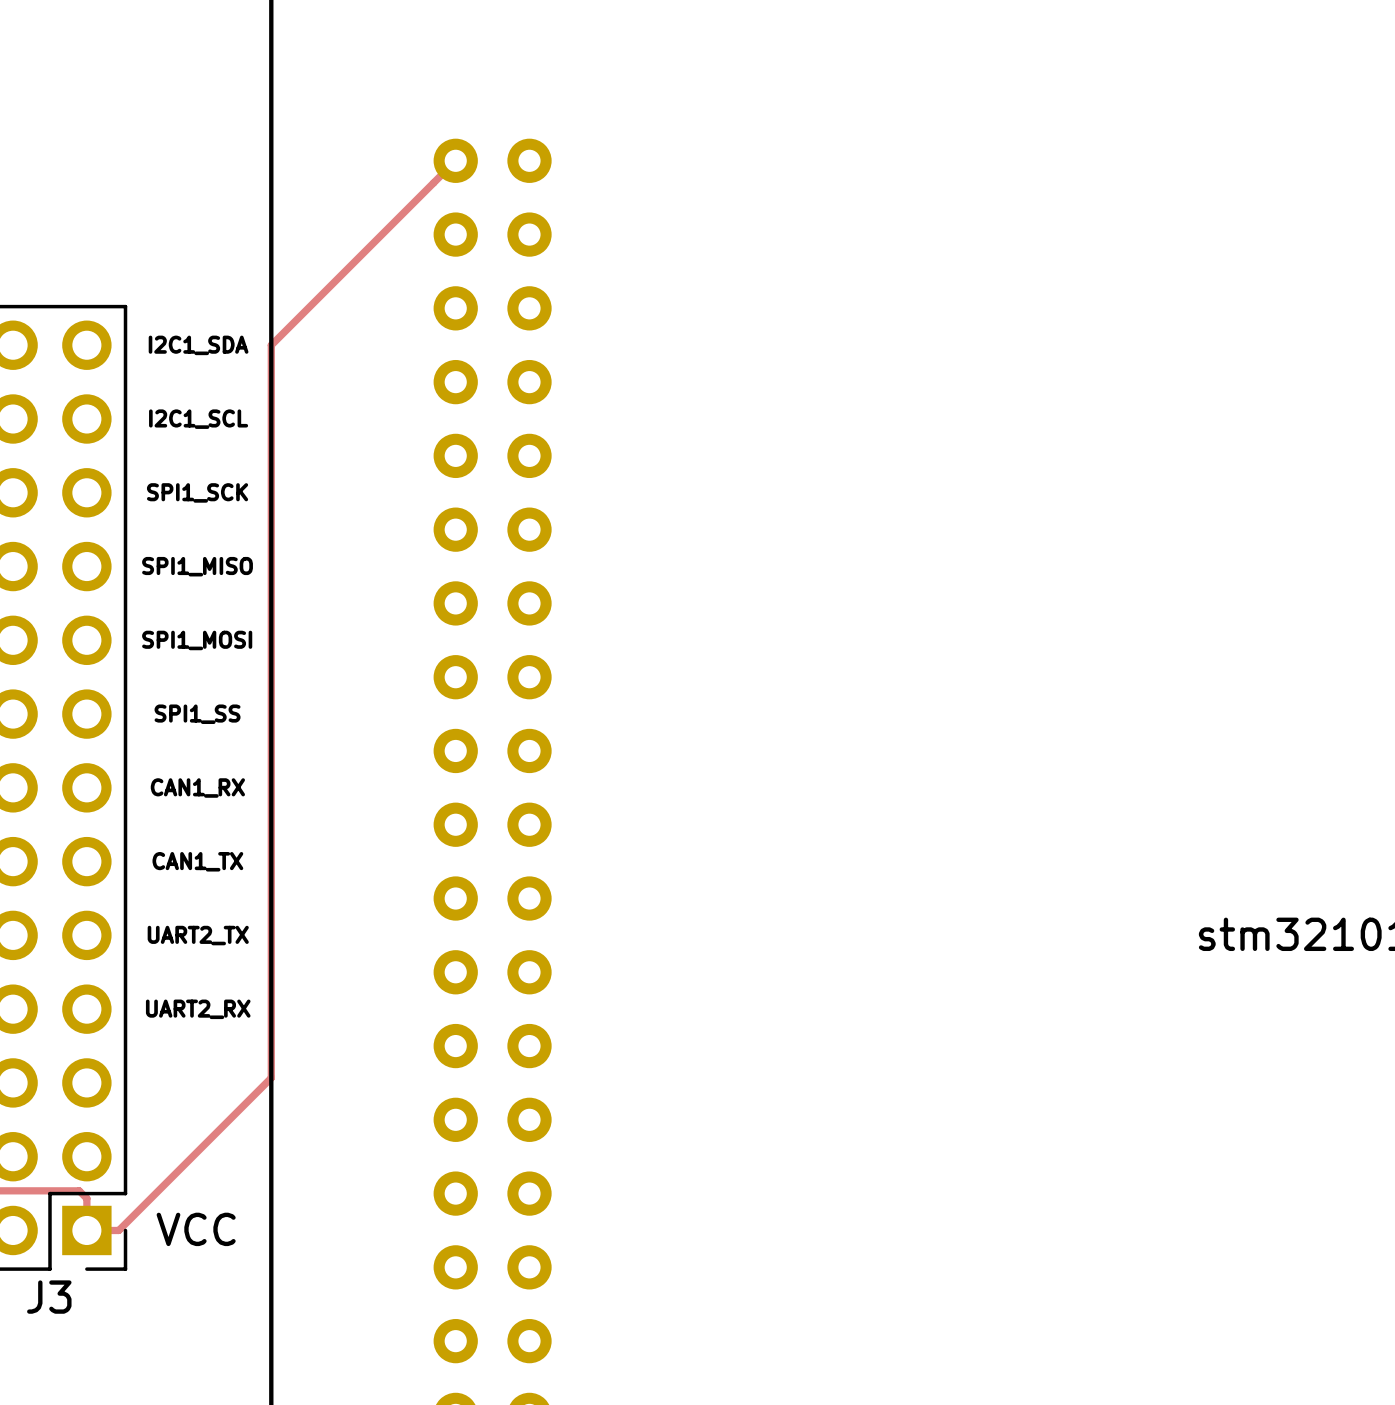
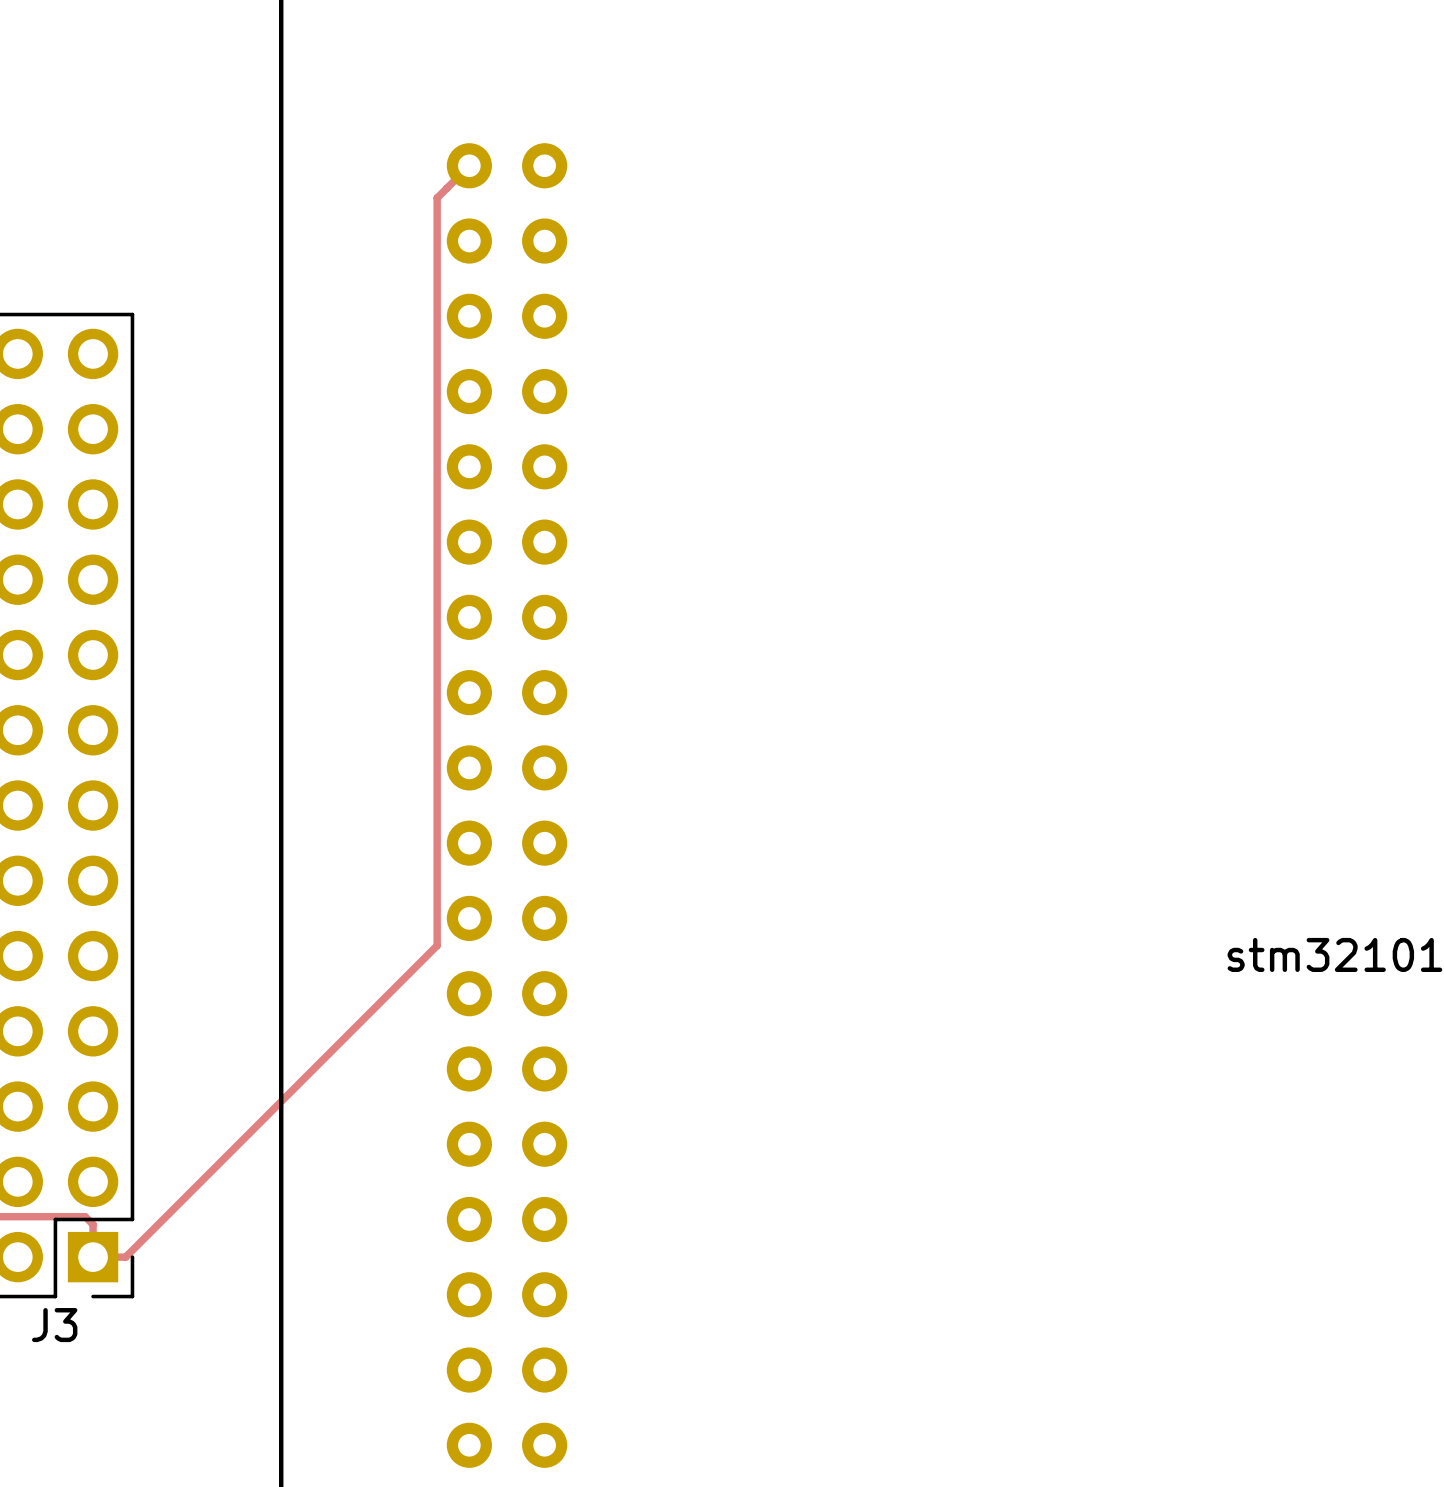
track: (424, 192) (271, 345) (271, 1078) -> (437, 197) (437, 945) (281, 1101)
text: I2C1_SDA (198, 345) -> none
text: I2C1_SCL (198, 419) -> none
text: SPI1_SCK (197, 492) -> none
text: SPI1_MISO (197, 566) -> none
text: SPI1_MOSI (197, 640) -> none
text: SPI1_SS (197, 714) -> none
text: CAN1_RX (197, 788) -> none
text: CAN1_TX (197, 861) -> none
text: UART2_TX (198, 935) -> none
text: UART2_RX (198, 1009) -> none
text: VCC (196, 1229) -> none

